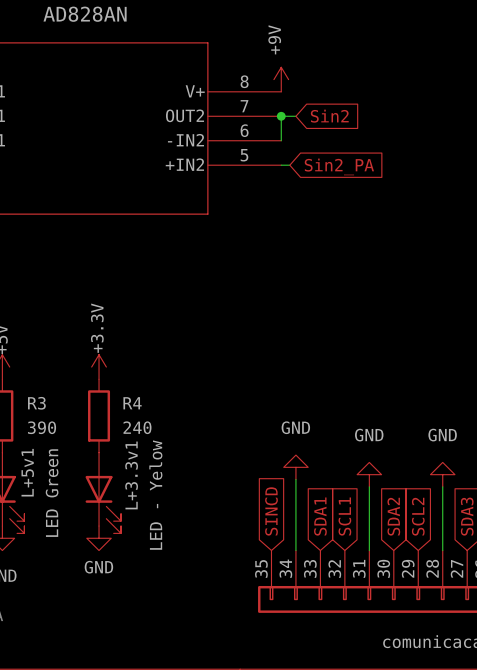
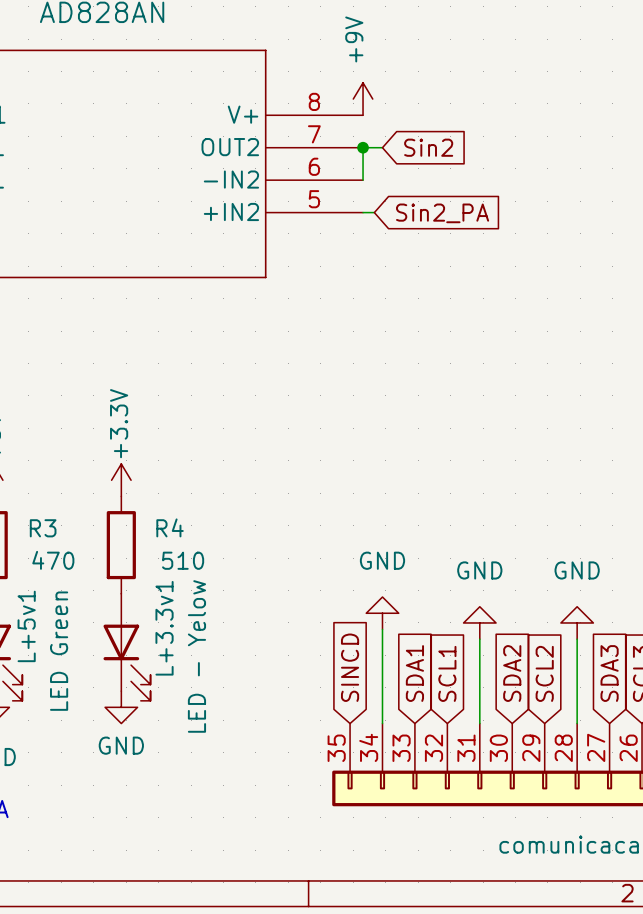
R3 value: 390 (42, 427) -> 470 (53, 560)
R4 value: 240 (137, 427) -> 510 (183, 560)

